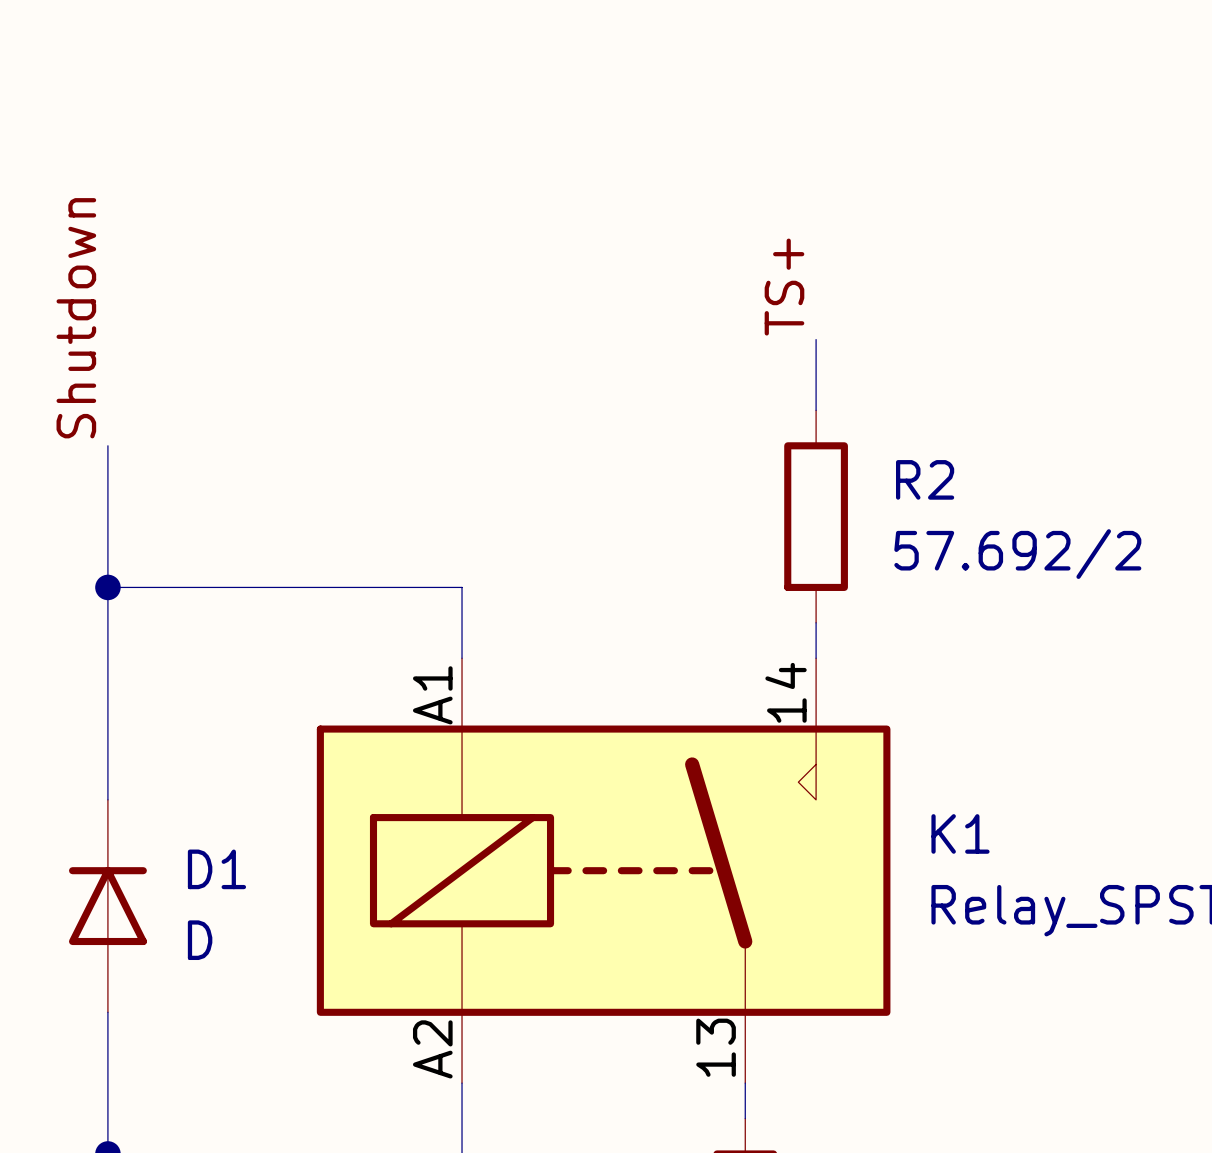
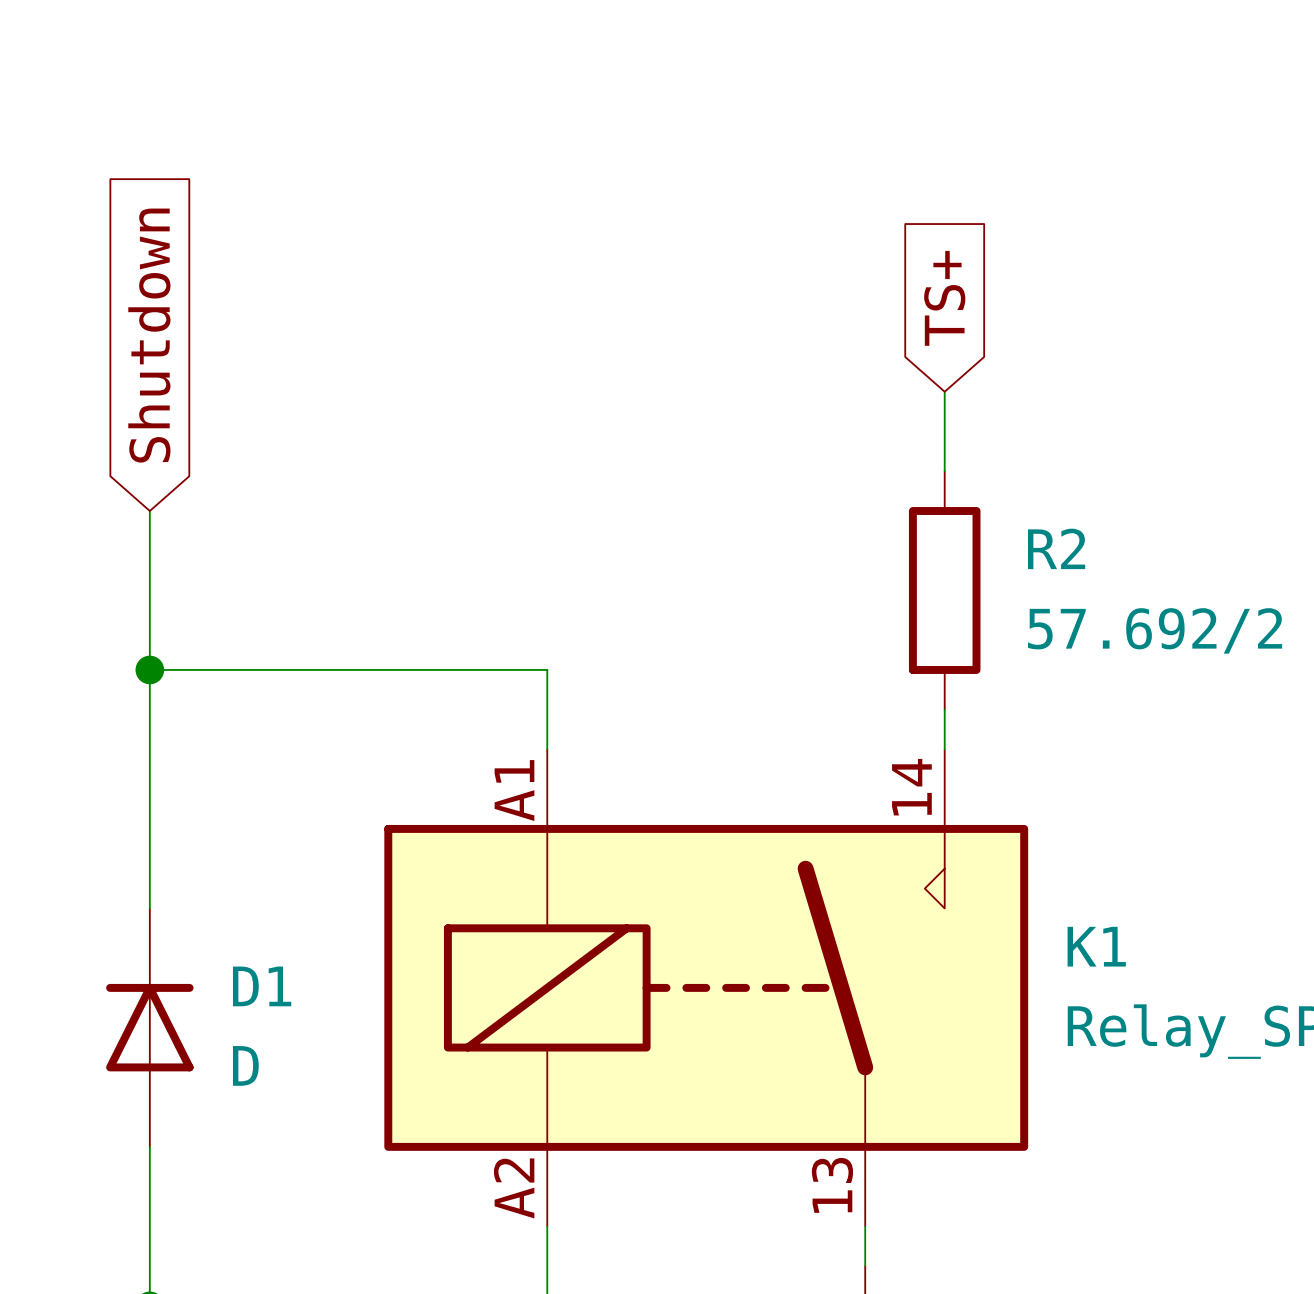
global label: none -> TS+ (944, 298)
global label: none -> Shutdown (149, 335)
label: TS+ (784, 287) -> none
label: Shutdown (76, 318) -> none

